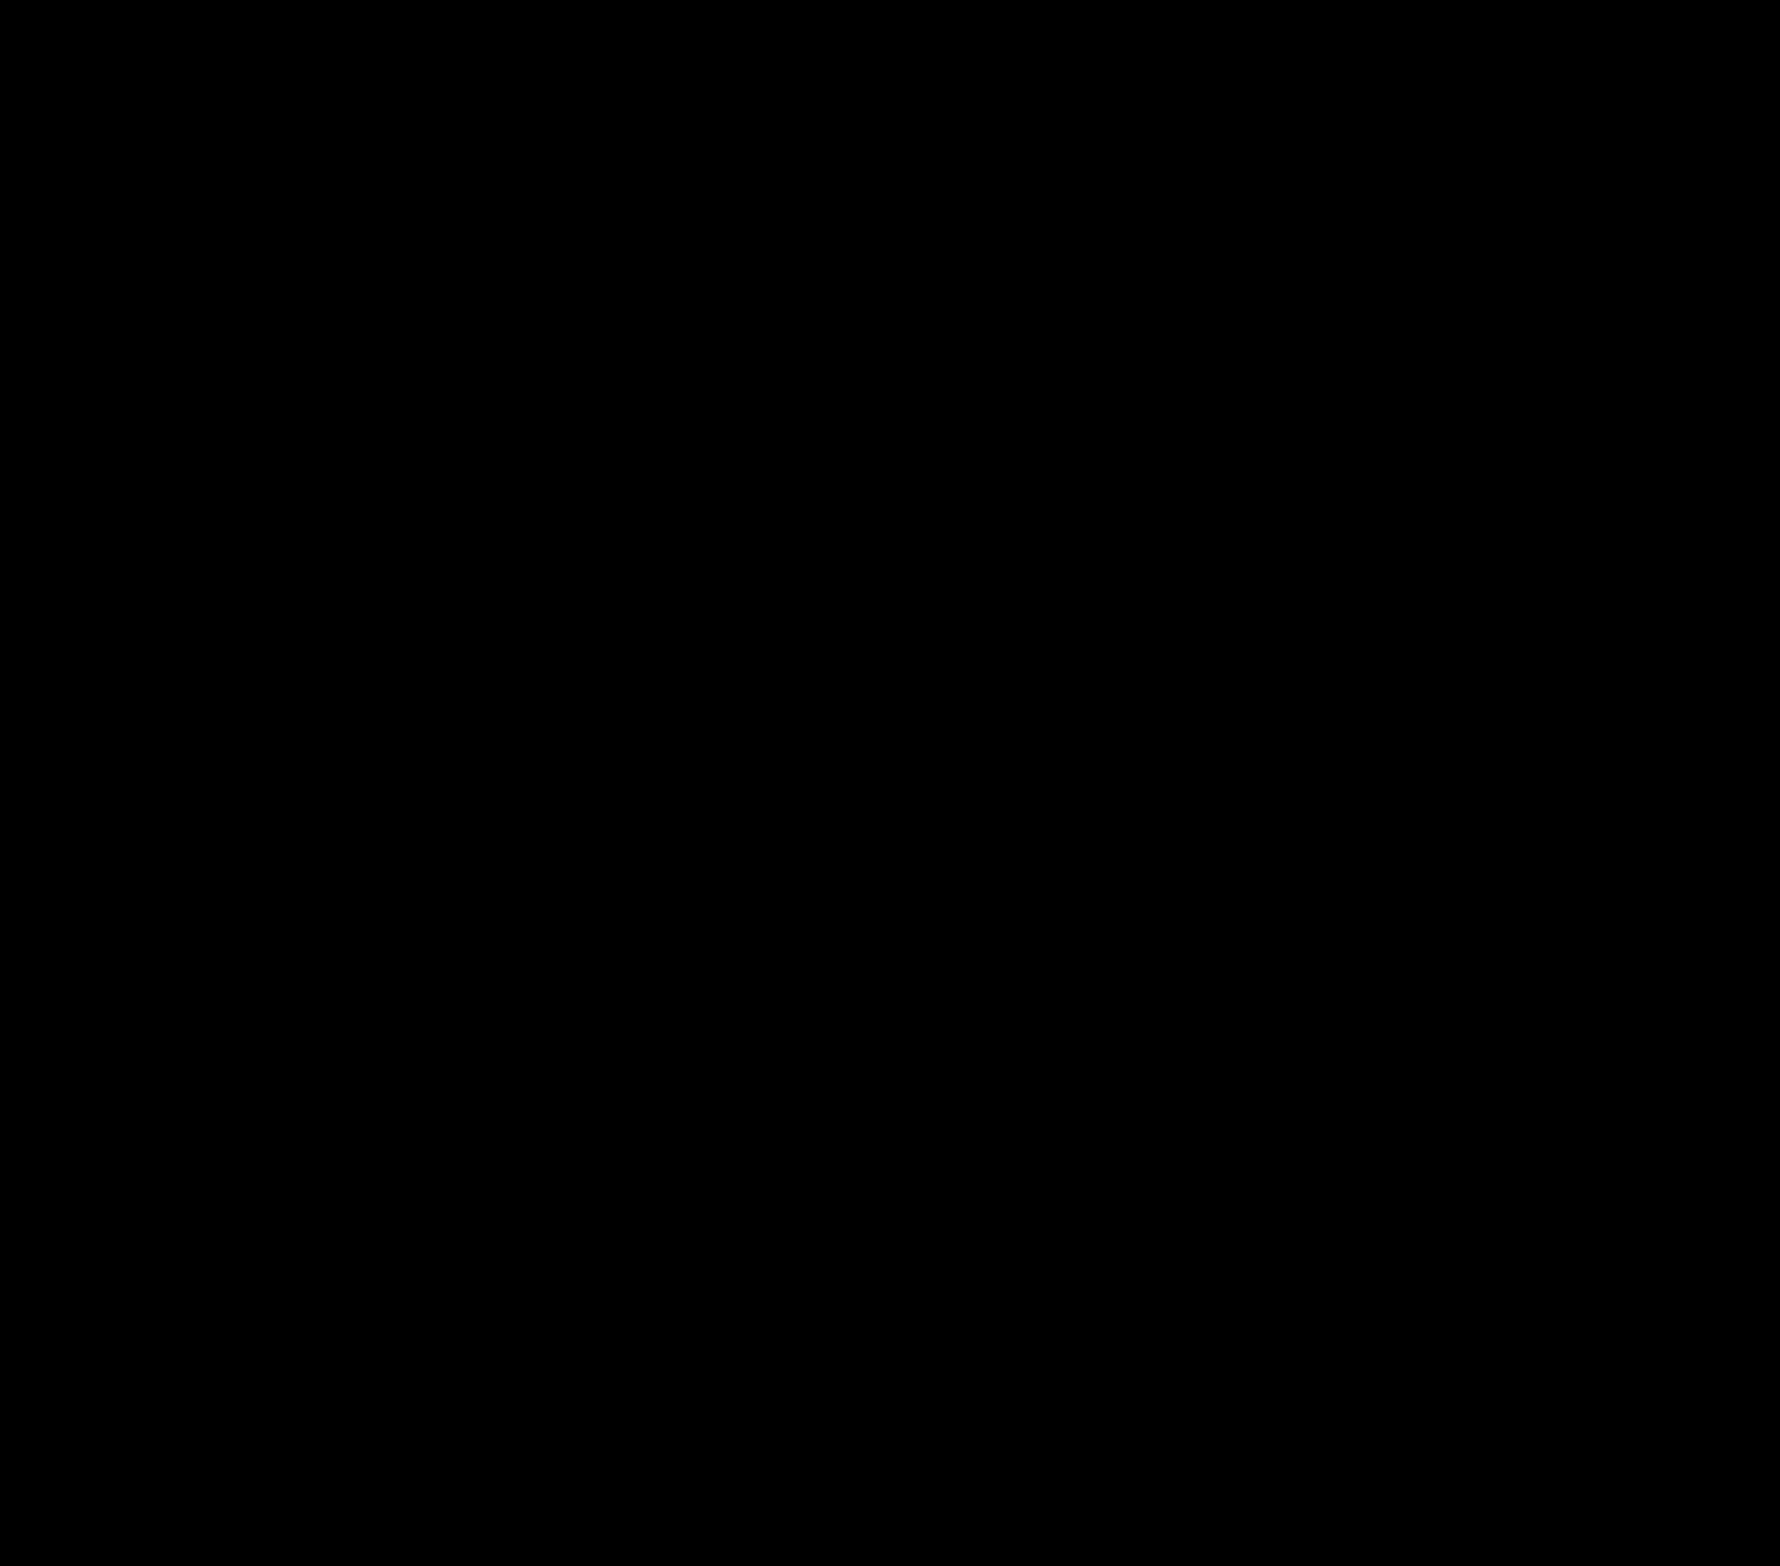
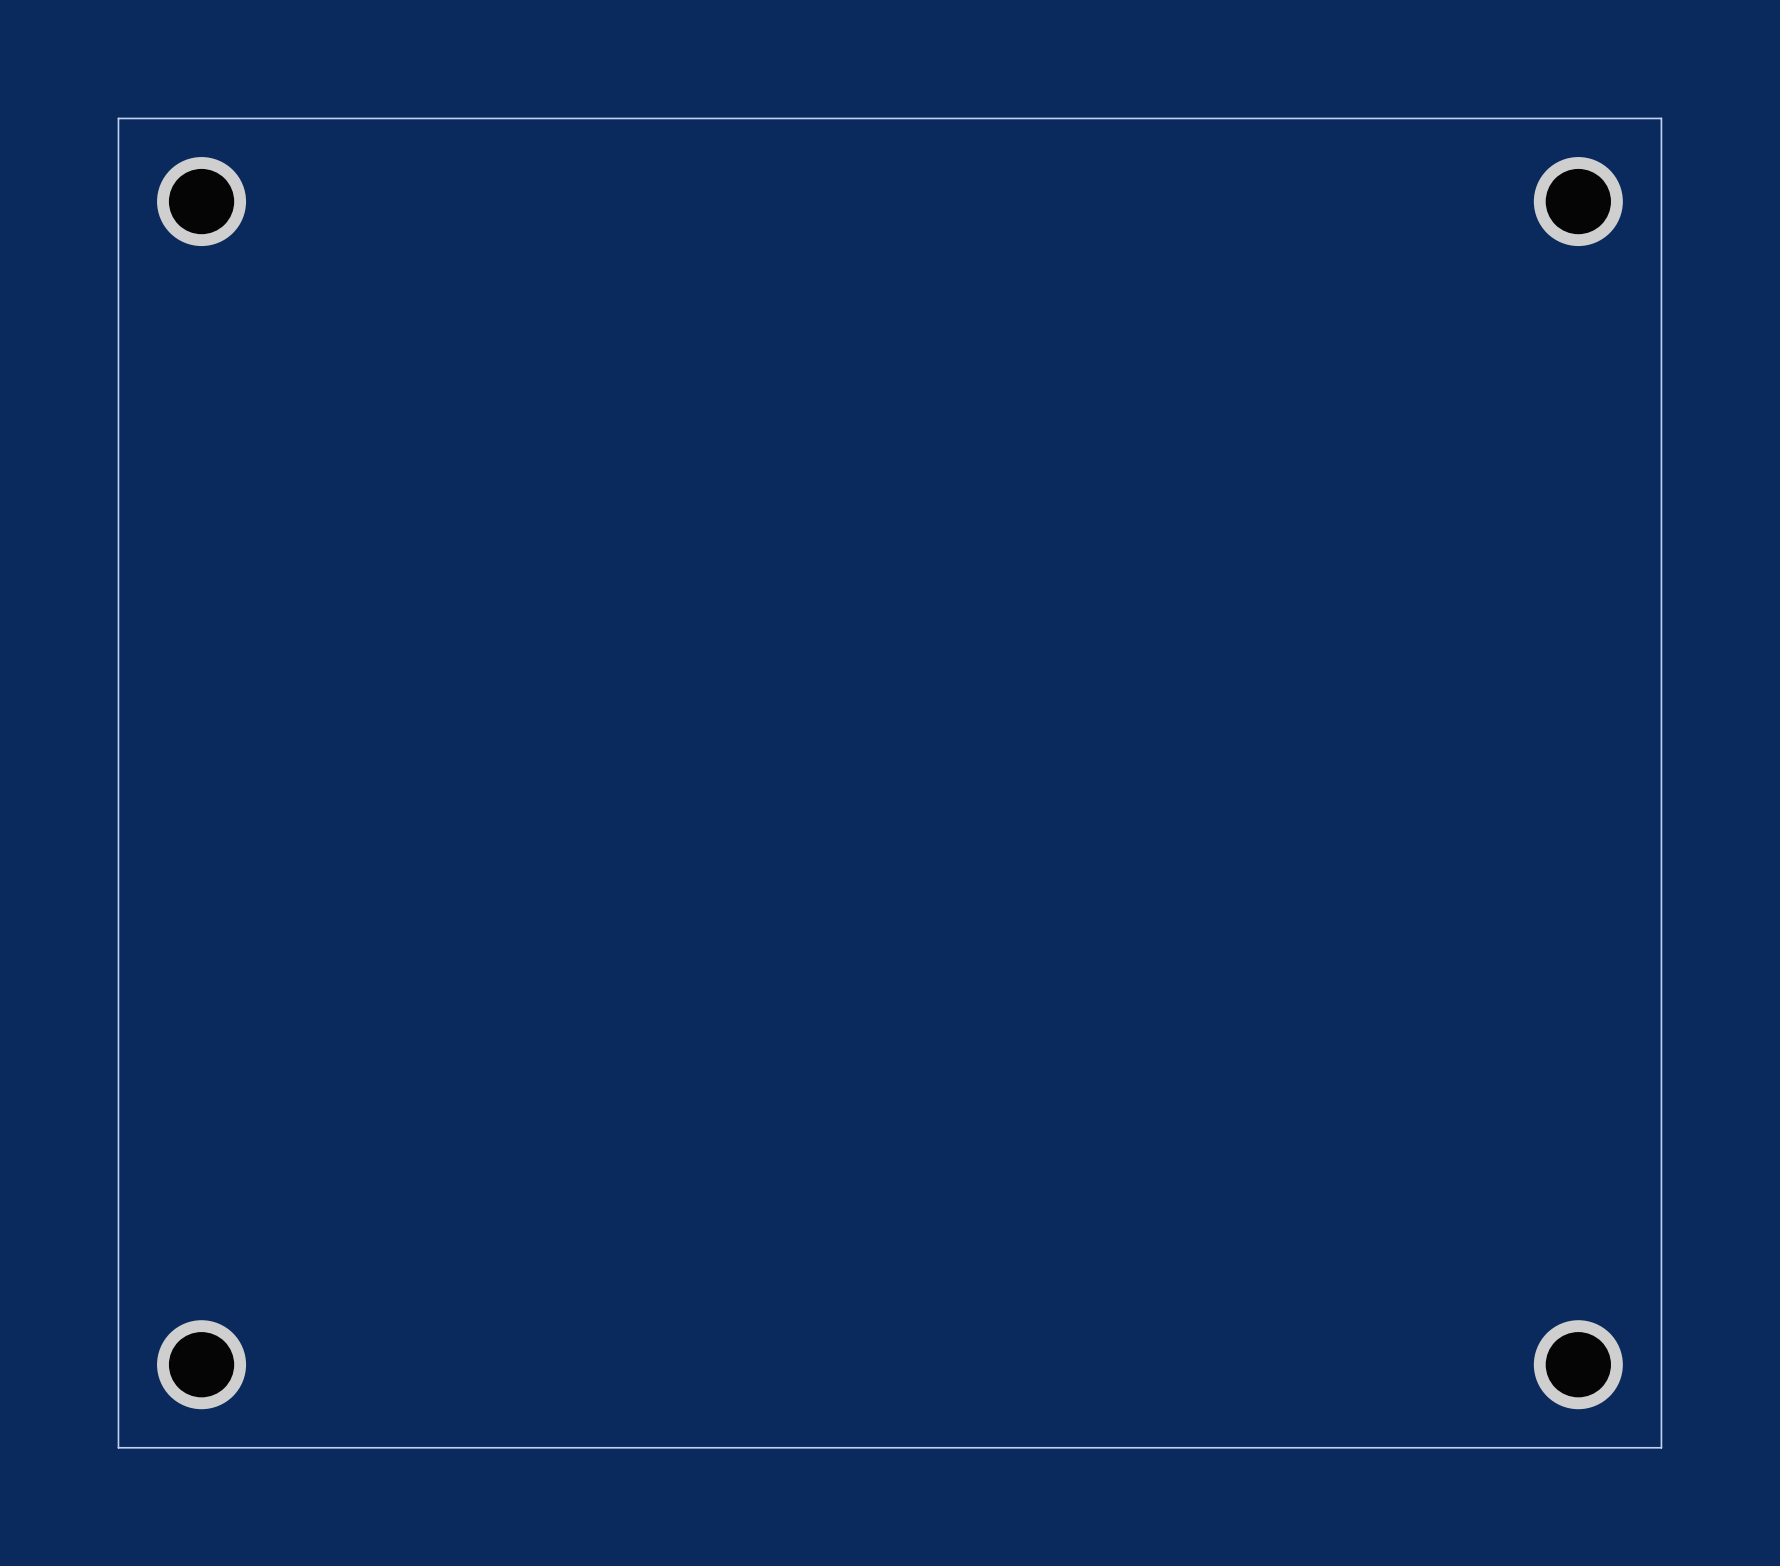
board edge: none -> (1661, 118) (118, 118) (118, 1447) (1661, 1447) (1661, 118)
part: none -> (201, 201)
part: none -> (1578, 201)
part: none -> (201, 1364)
part: none -> (1578, 1364)

